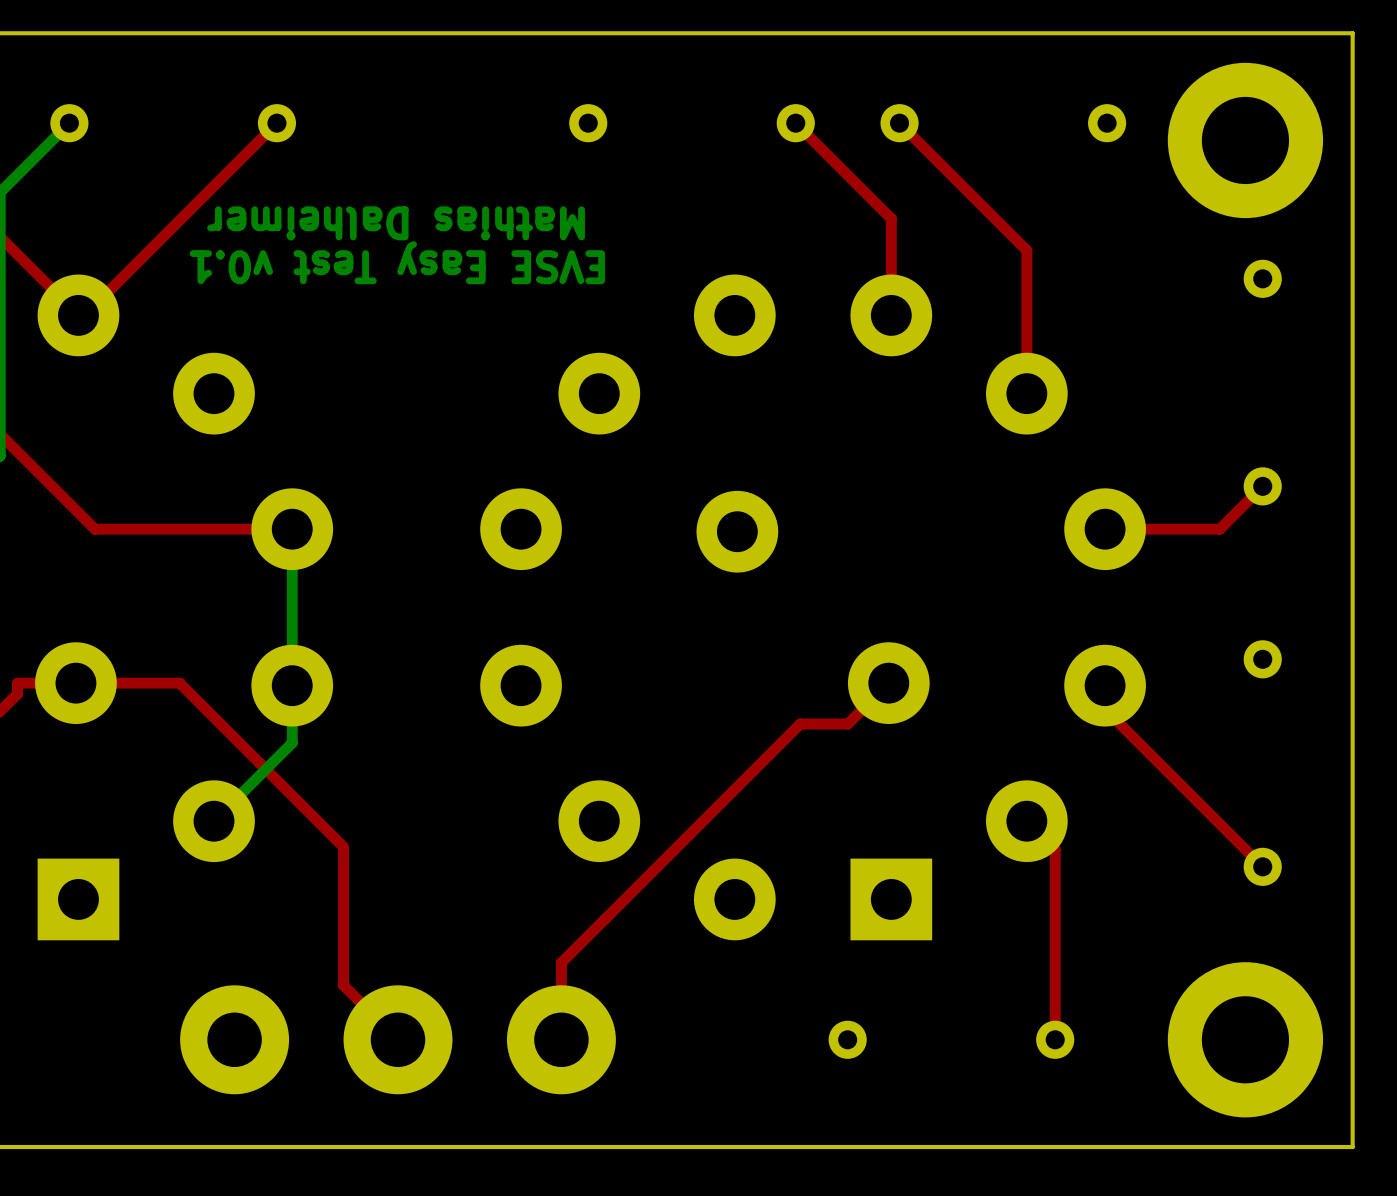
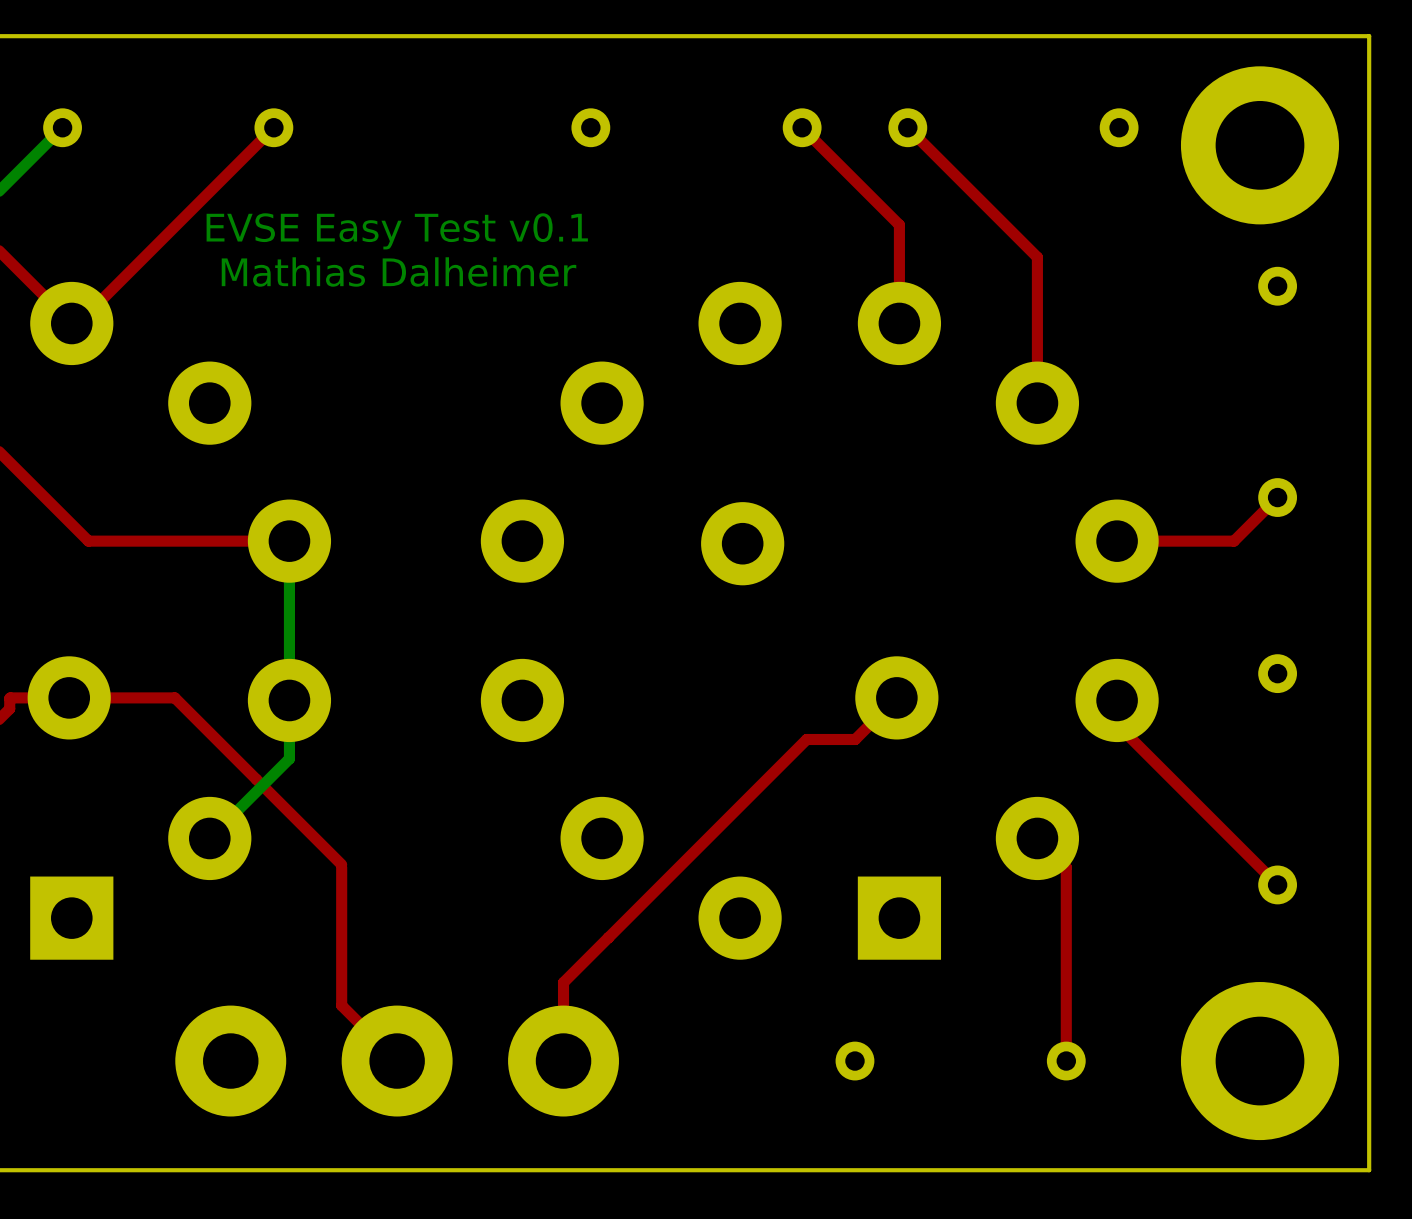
text: Mathias Dalheimer (396, 223) -> EVSE Easy Test v0.1 (397, 231)
text: EVSE Easy Test v0.1 (397, 262) -> Mathias Dalheimer (399, 271)

